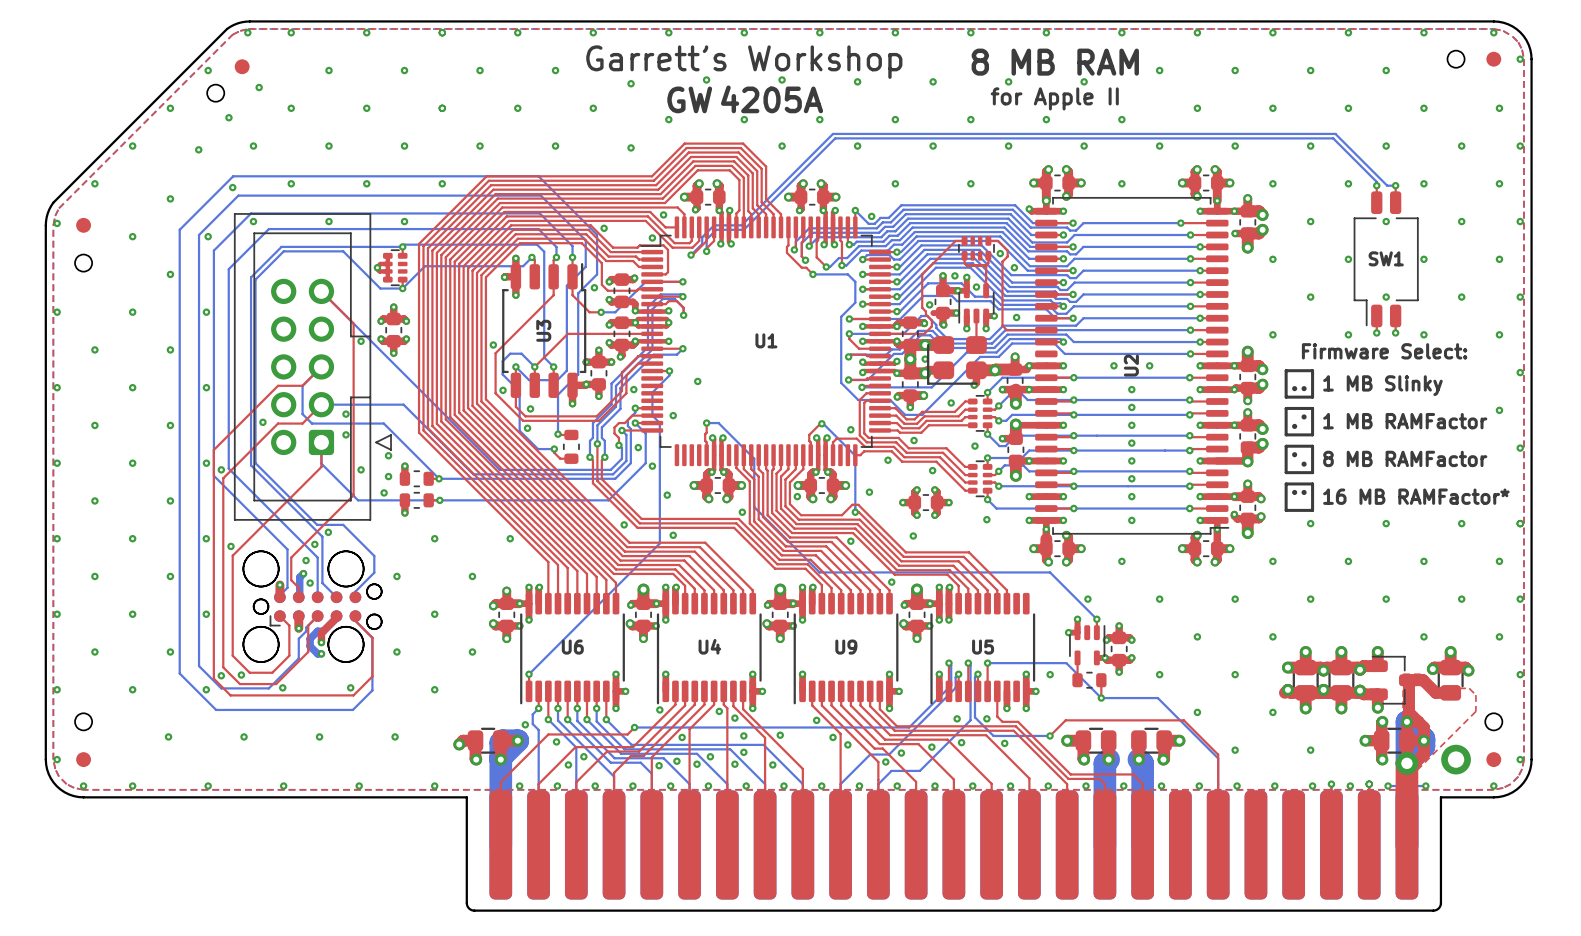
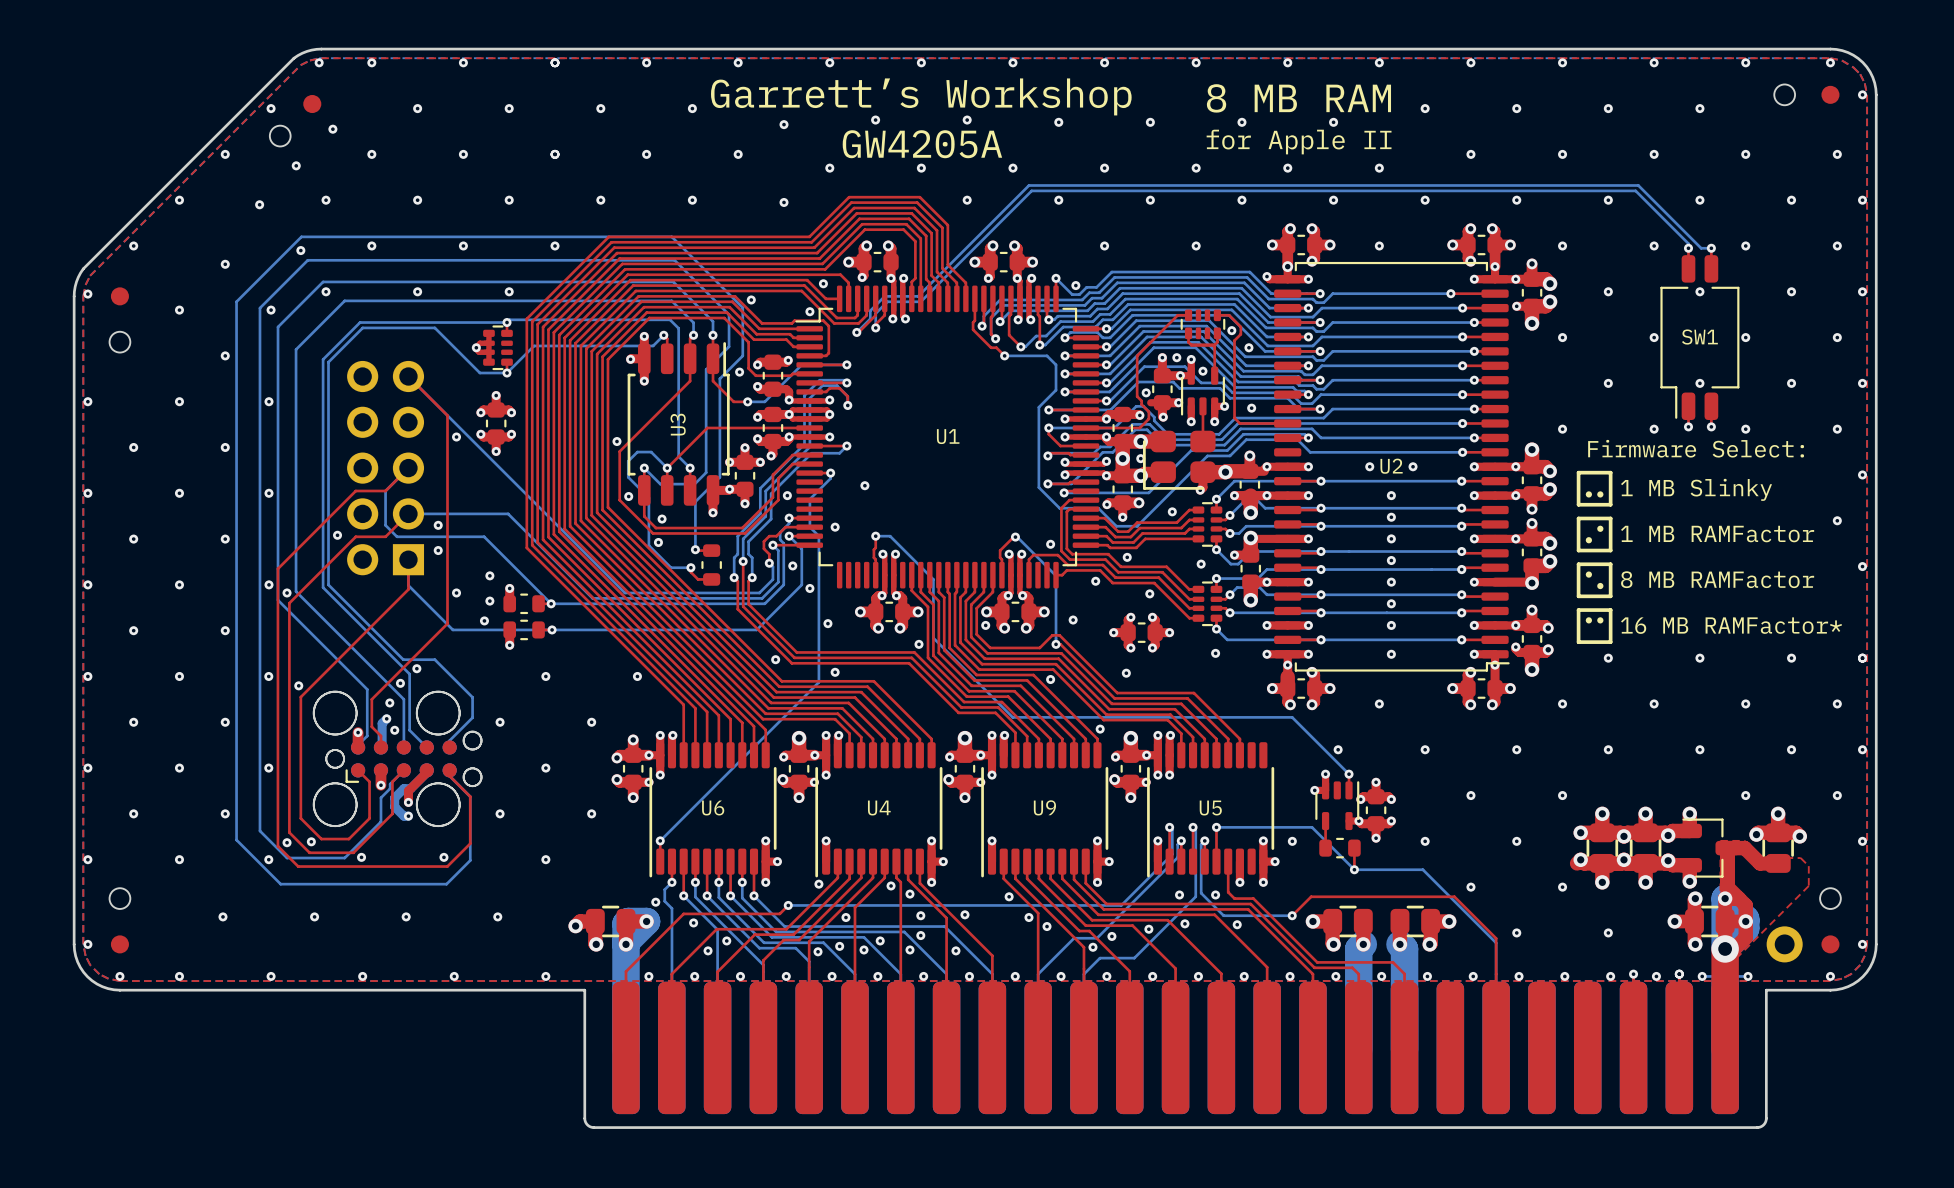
part footprint: [233, 213, 392, 521] -> [347, 360, 425, 576]
U2 name rotation: 0° (1131, 365) -> 90° clockwise (1391, 466)

